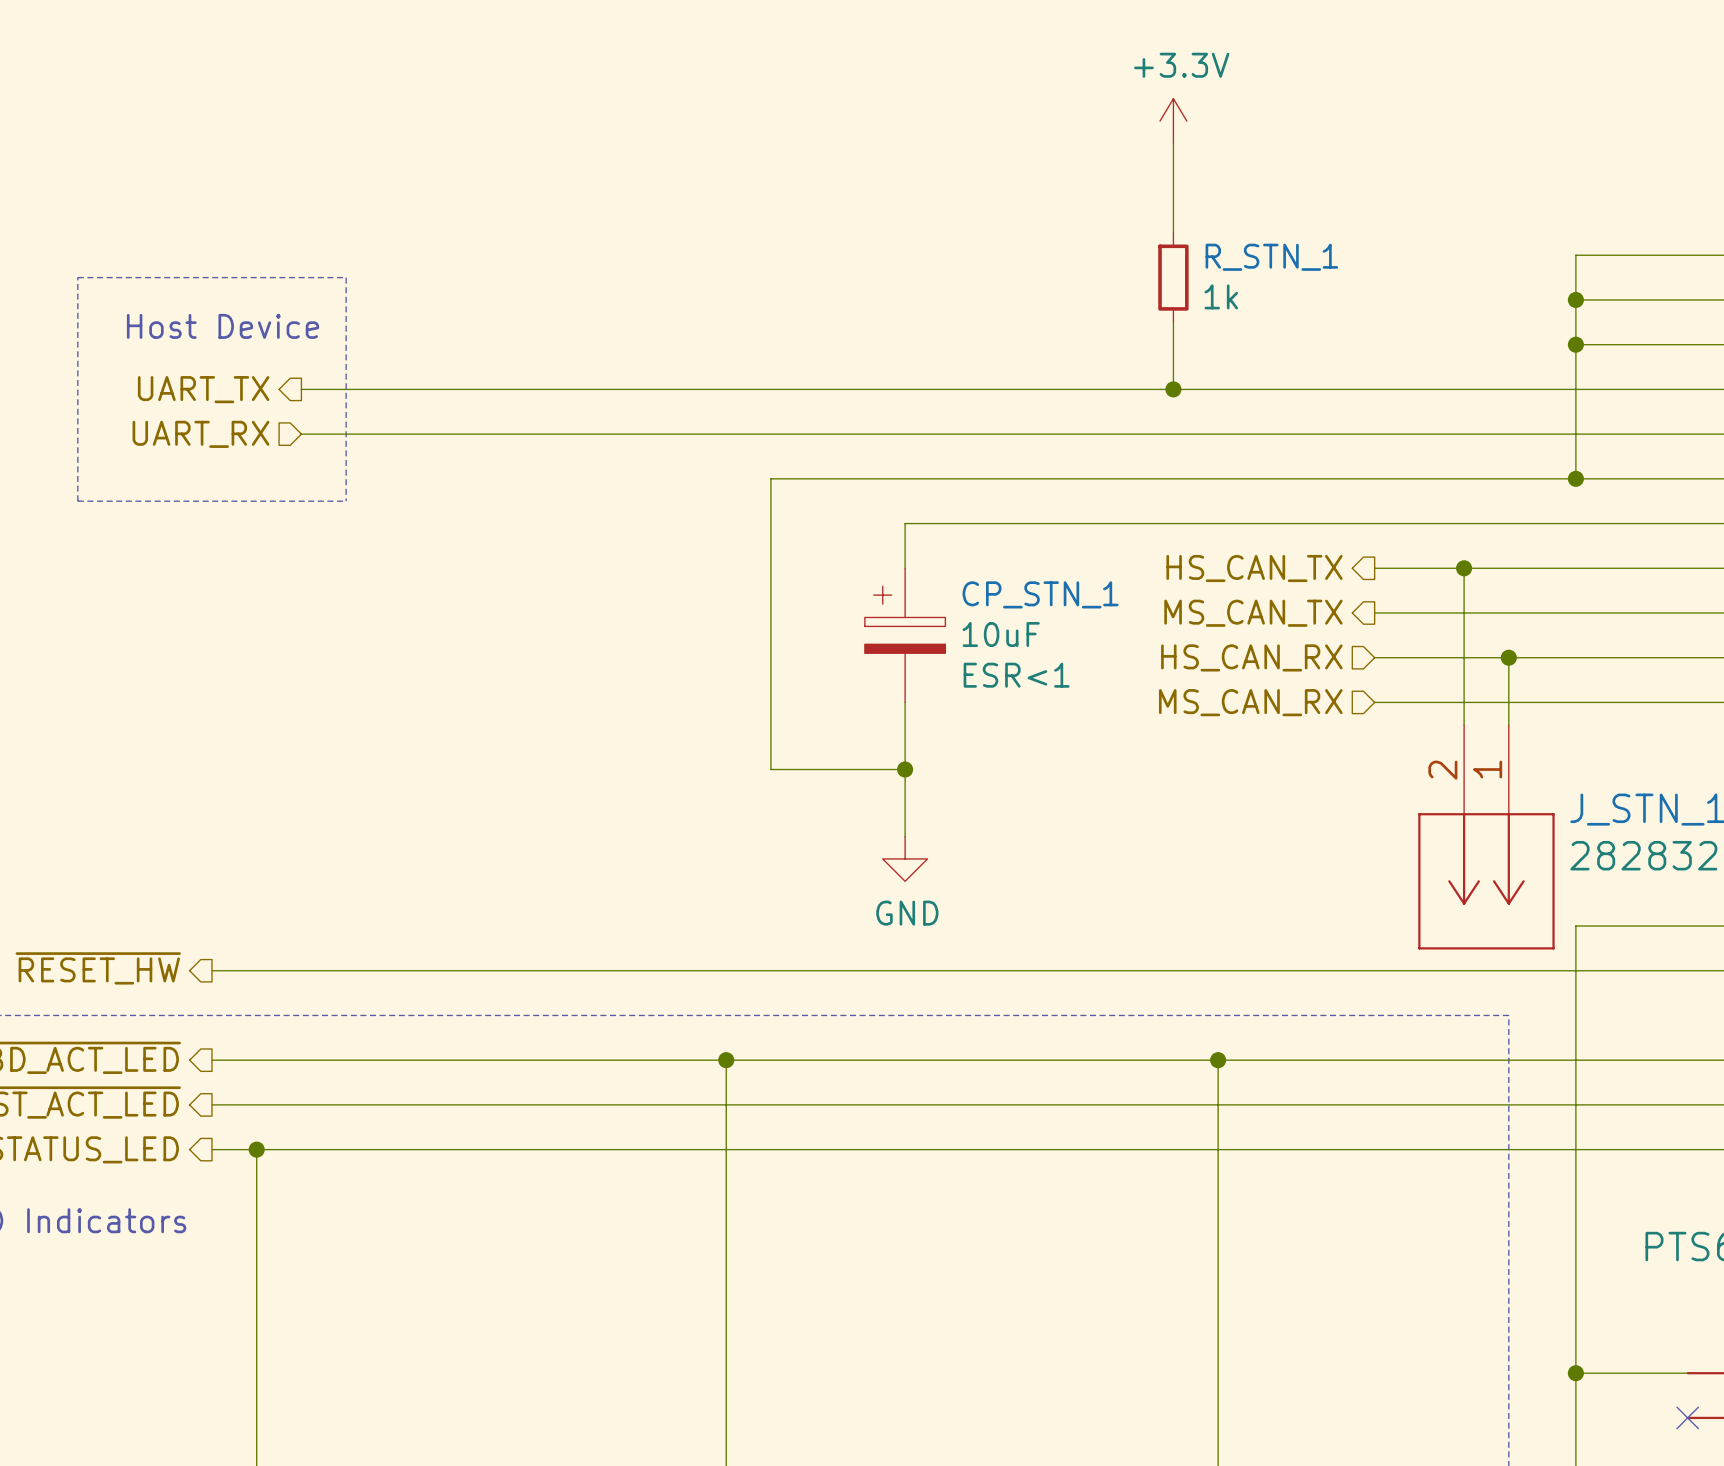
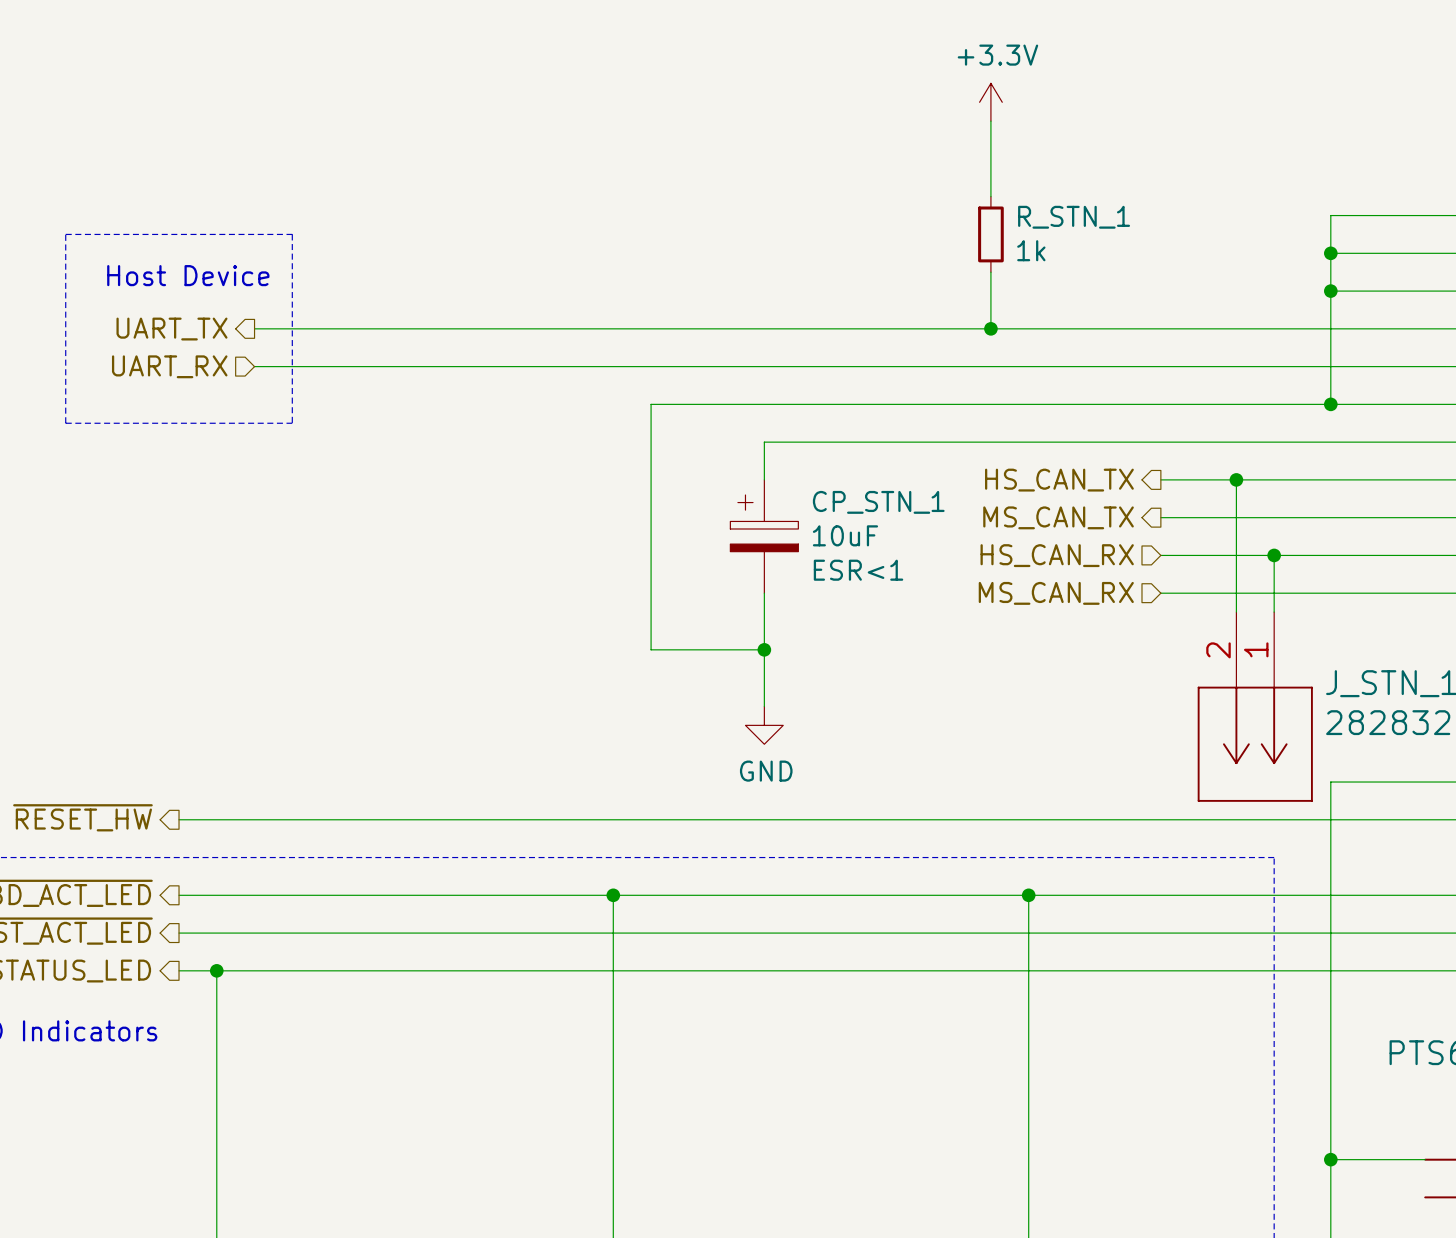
no-connect mark: (1687, 1417) -> none

